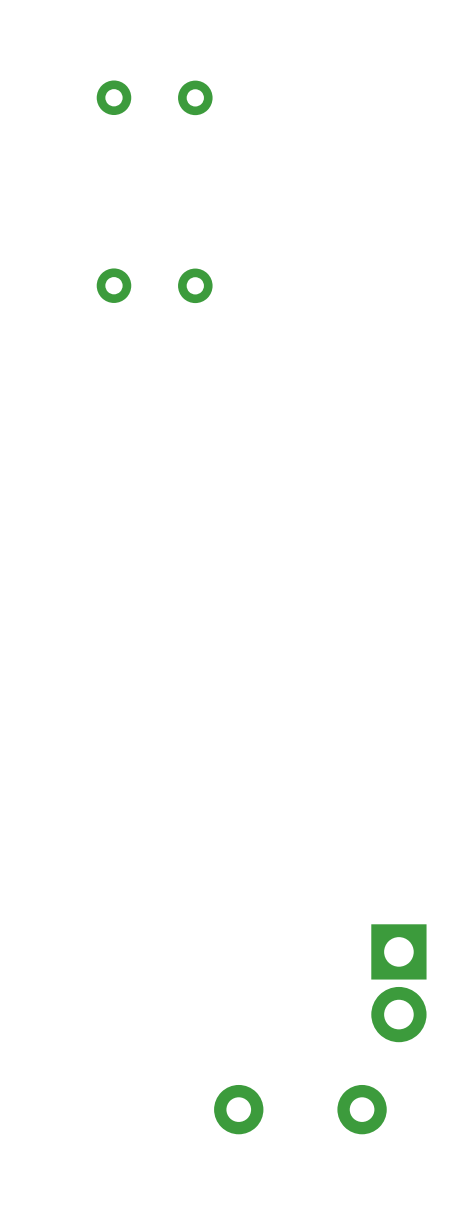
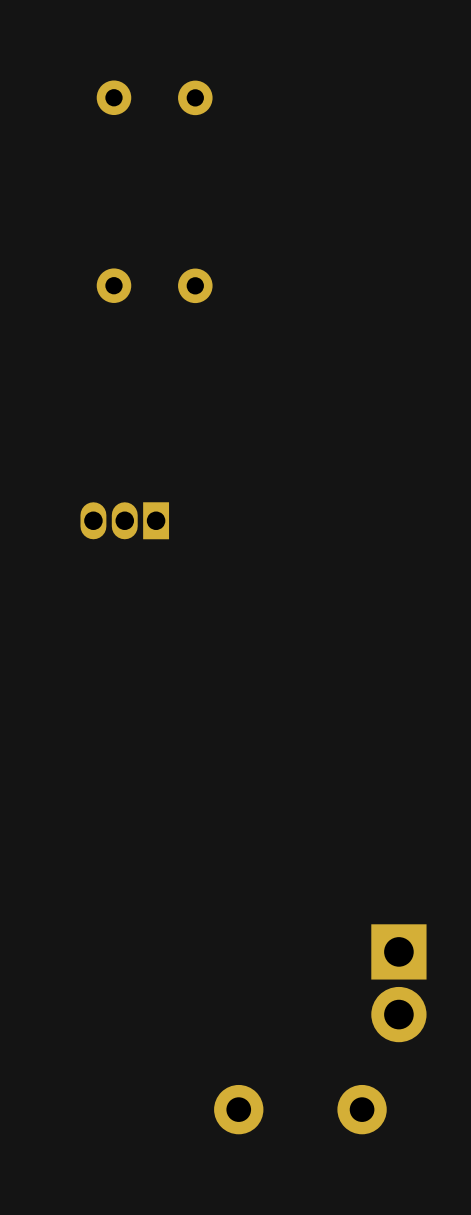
part: none -> (124, 520)

